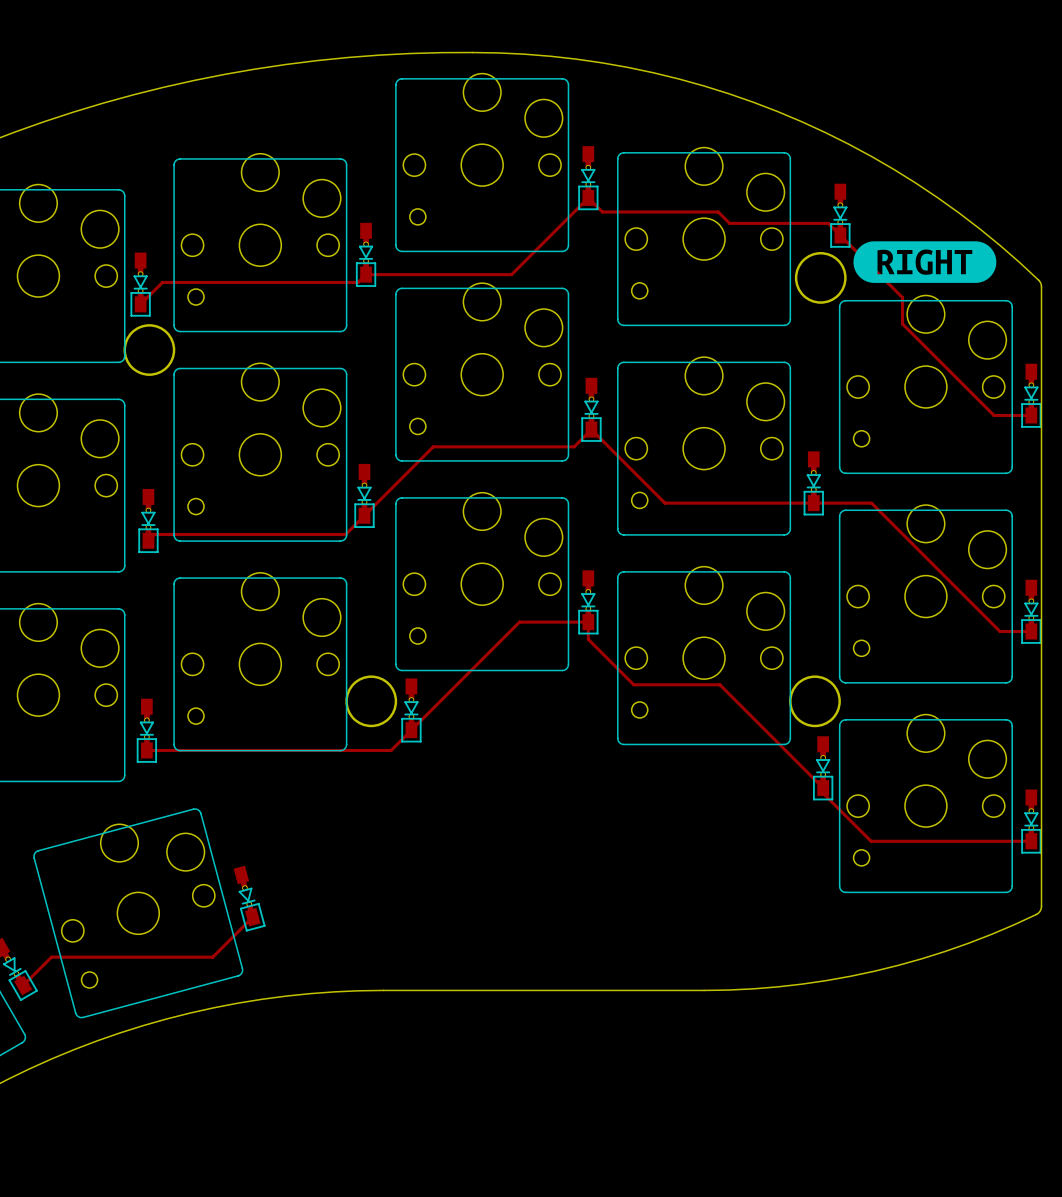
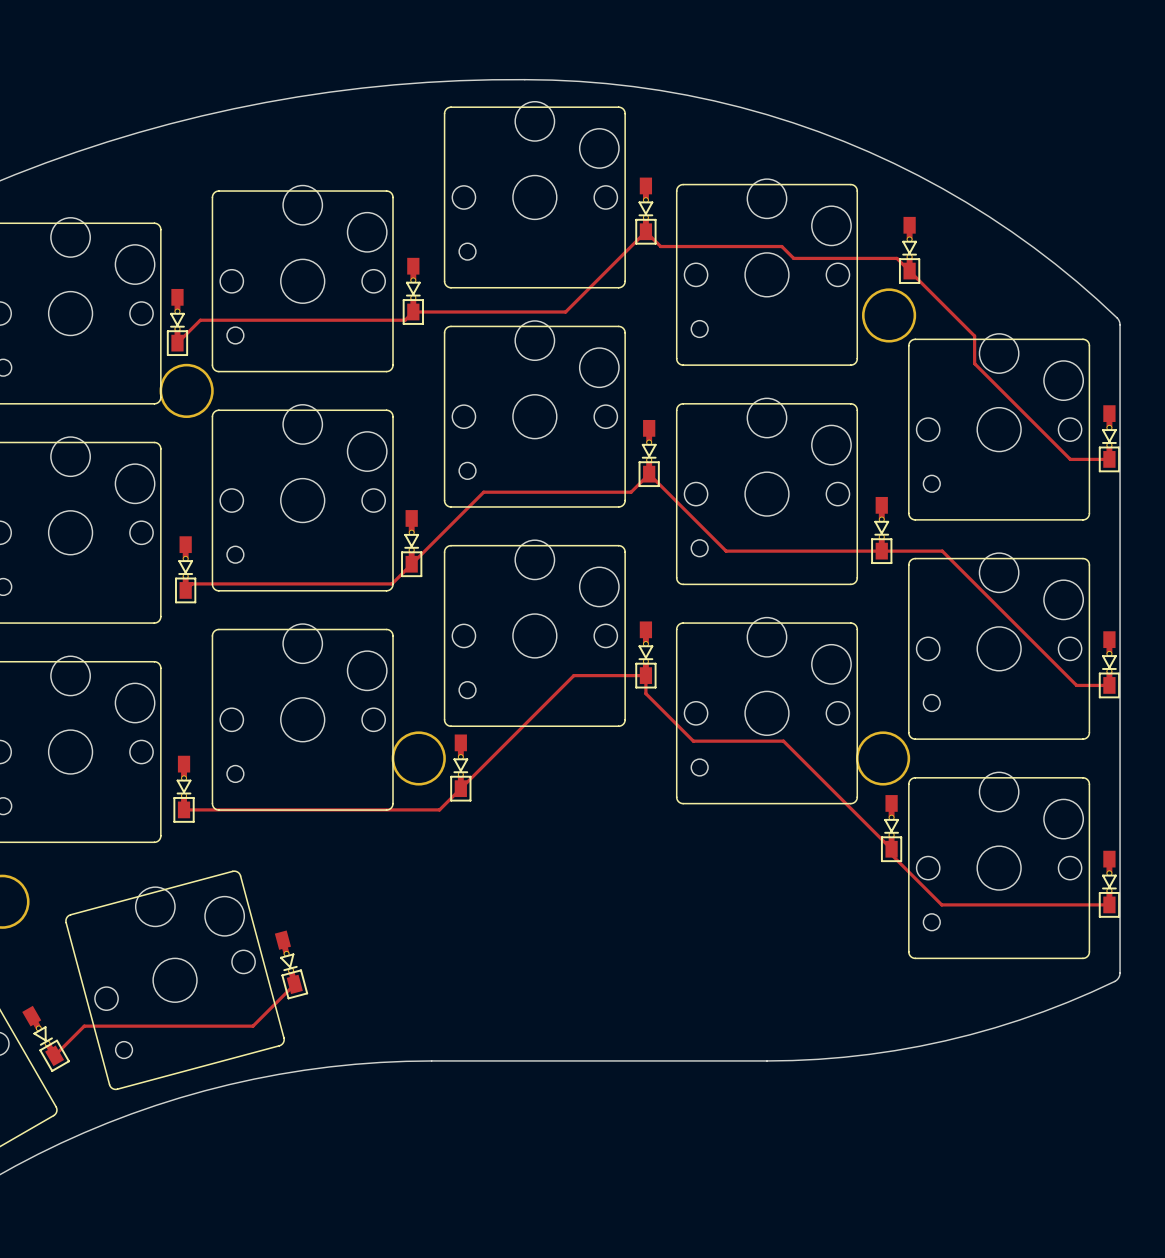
drawing: [853, 241, 997, 283] -> none

